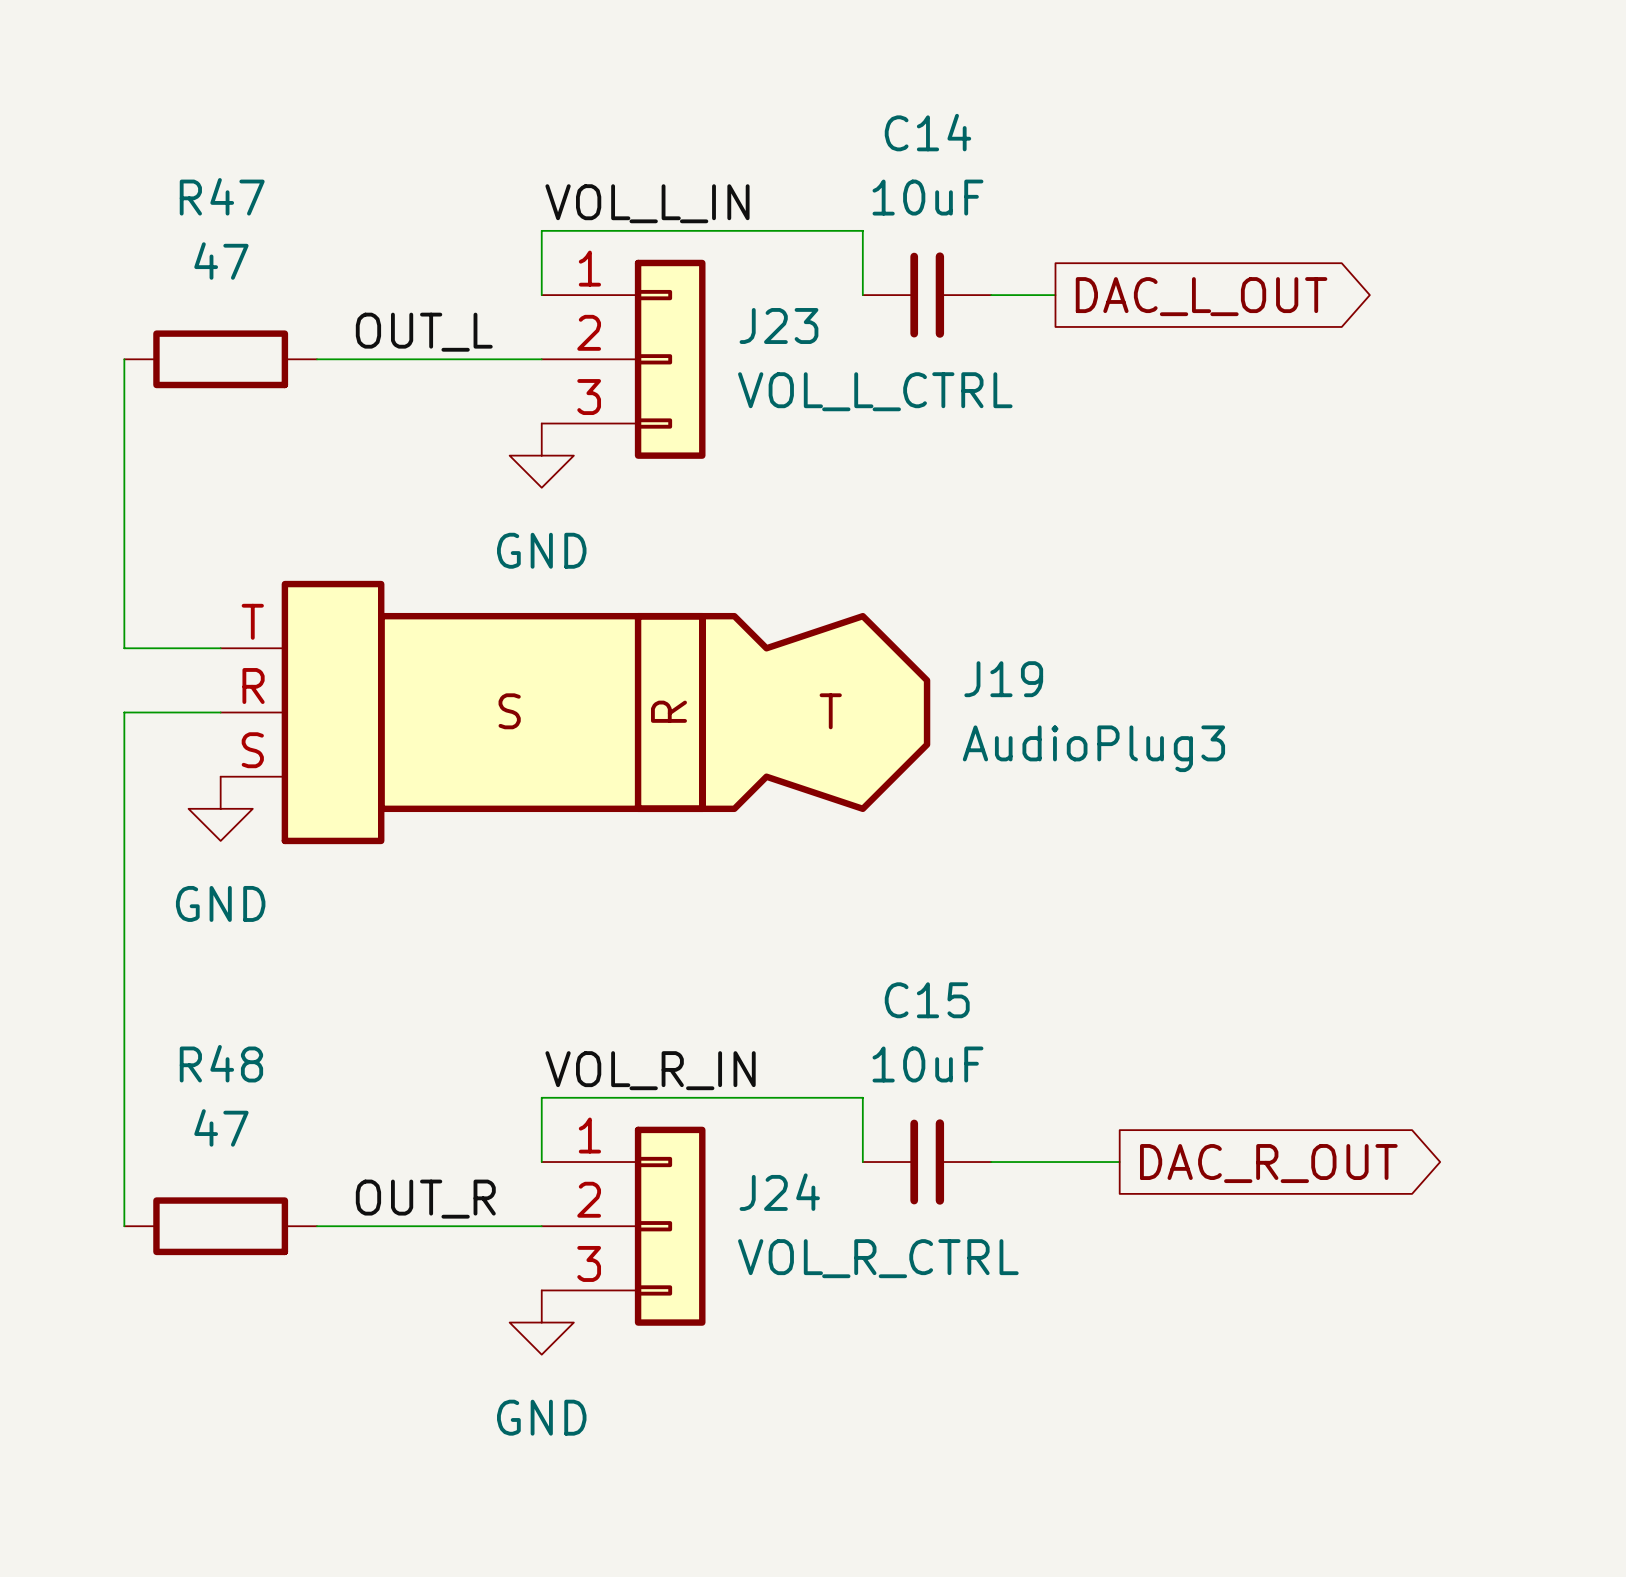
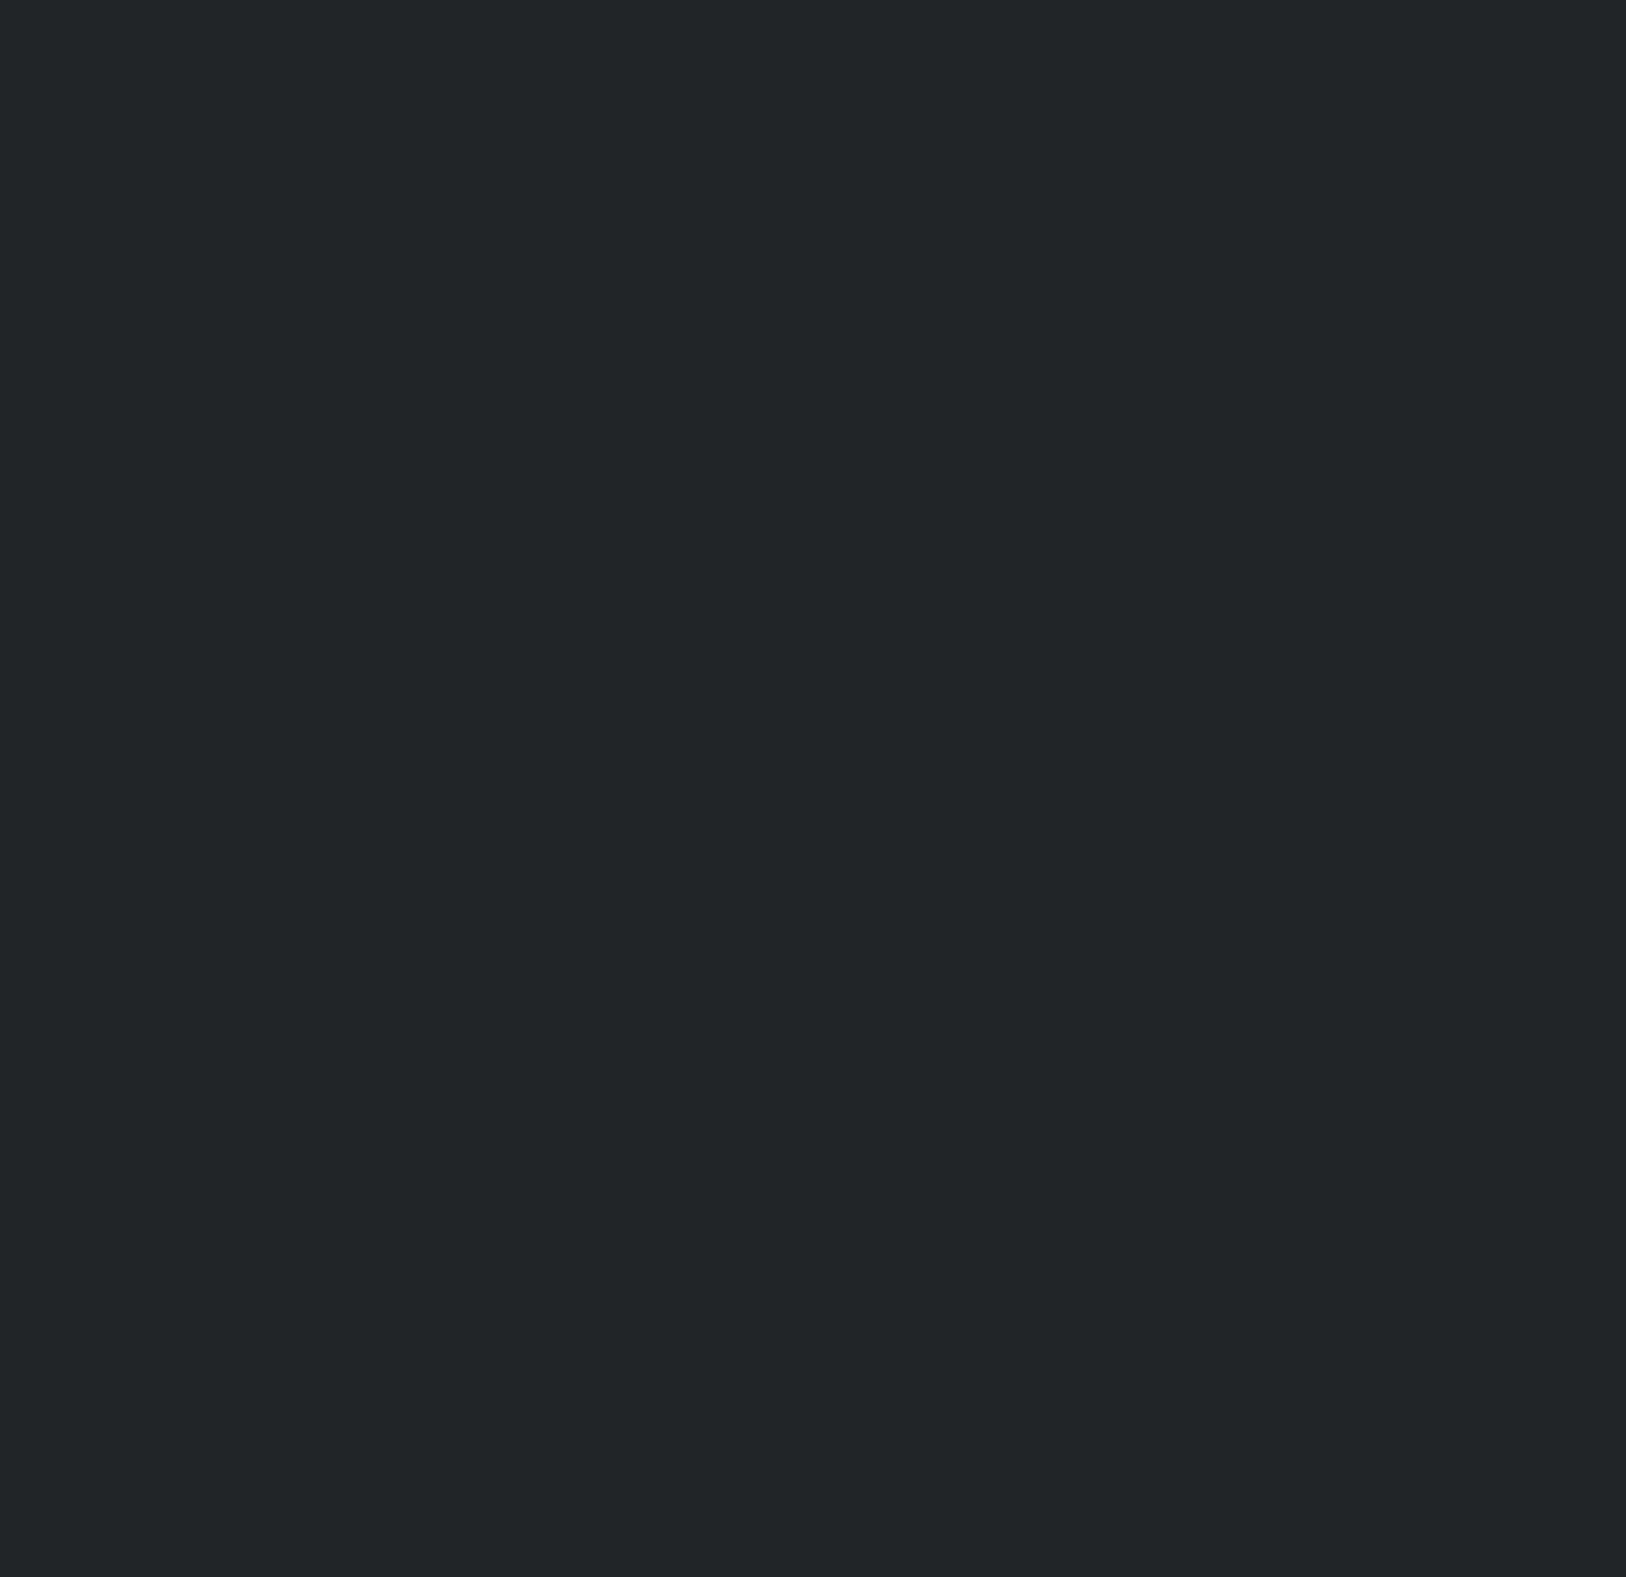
label: VOL_L_IN (647, 203) -> none
wire: (541, 295) (541, 230) (862, 230) (862, 295) -> none
C14: 10uF (927, 295) -> none
wire: (991, 295) (1055, 295) -> none
global label: DAC_L_OUT (1201, 296) -> none
label: OUT_L (424, 332) -> none
wire: (124, 359) (124, 648) (220, 648) -> none
R47: 47 (220, 359) -> none
wire: (316, 359) (541, 359) -> none
J23: VOL_L_CTRL (623, 359) -> none
power symbol: GND (541, 455) -> none
wire: (220, 712) (124, 712) (124, 1226) -> none
J19: AudioPlug3 (575, 712) -> none
power symbol: GND (220, 808) -> none
label: VOL_R_IN (650, 1070) -> none
wire: (541, 1162) (541, 1097) (862, 1097) (862, 1162) -> none
C15: 10uF (927, 1162) -> none
wire: (991, 1162) (1119, 1162) -> none
global label: DAC_R_OUT (1268, 1163) -> none
label: OUT_R (425, 1199) -> none
R48: 47 (220, 1226) -> none
wire: (316, 1226) (541, 1226) -> none
J24: VOL_R_CTRL (623, 1226) -> none
power symbol: GND (541, 1322) -> none

